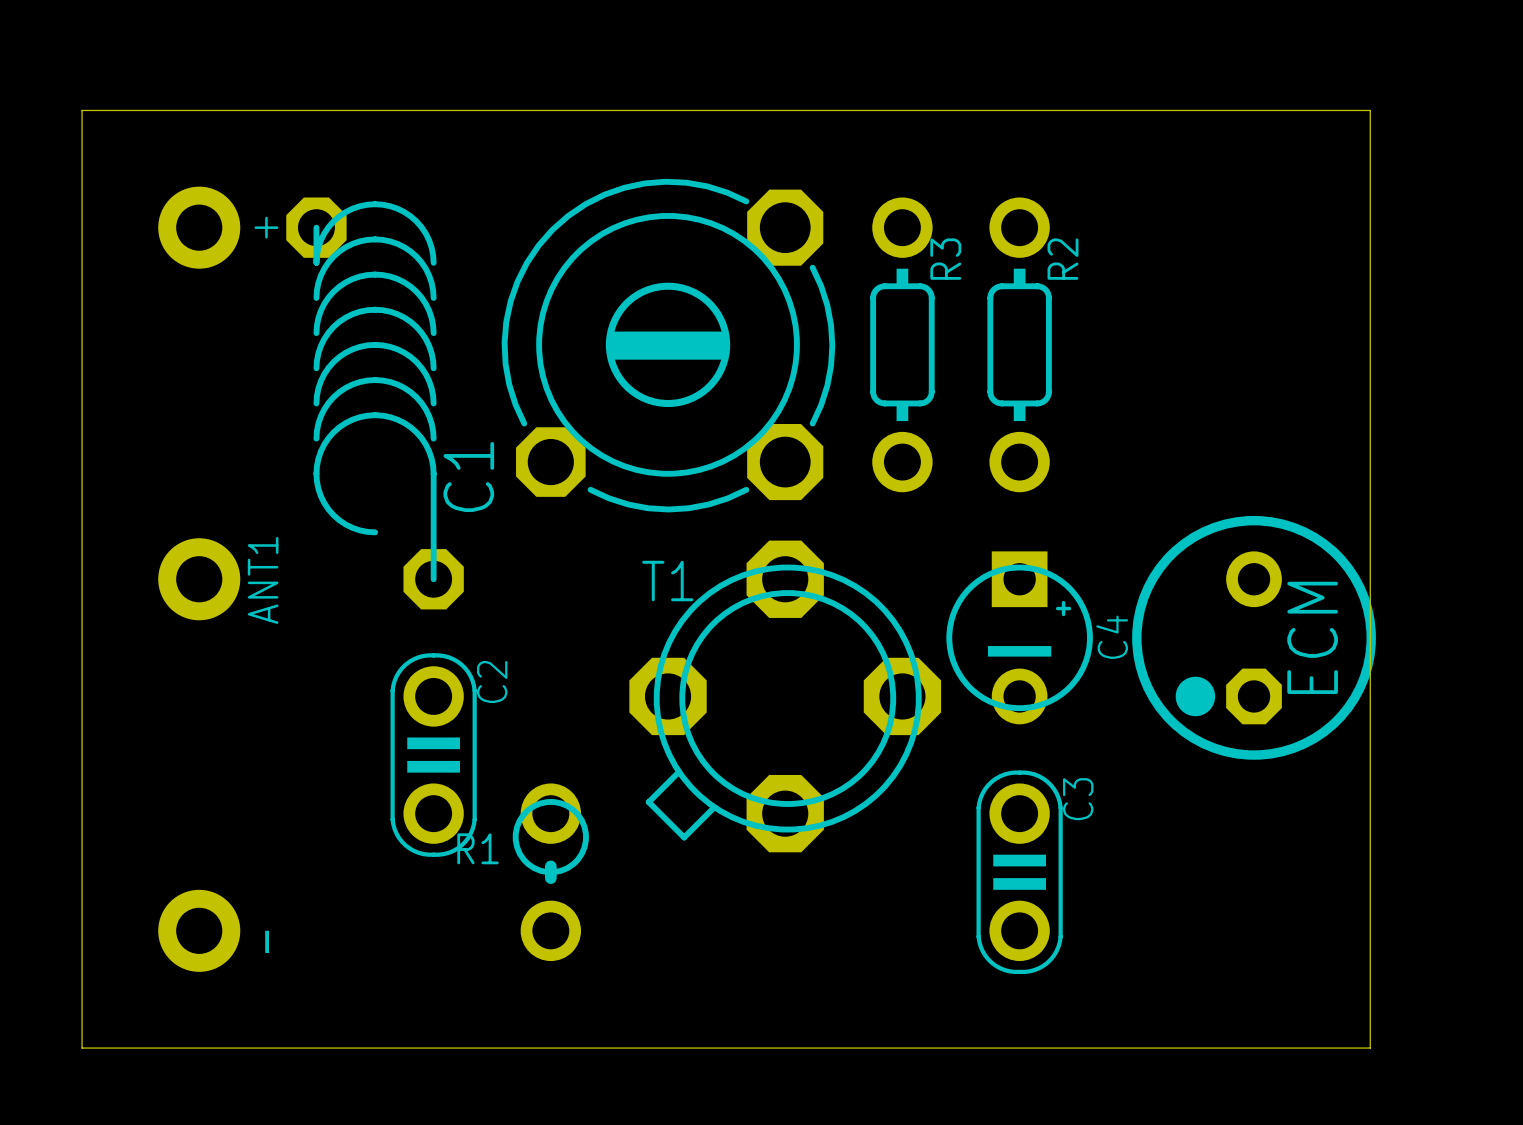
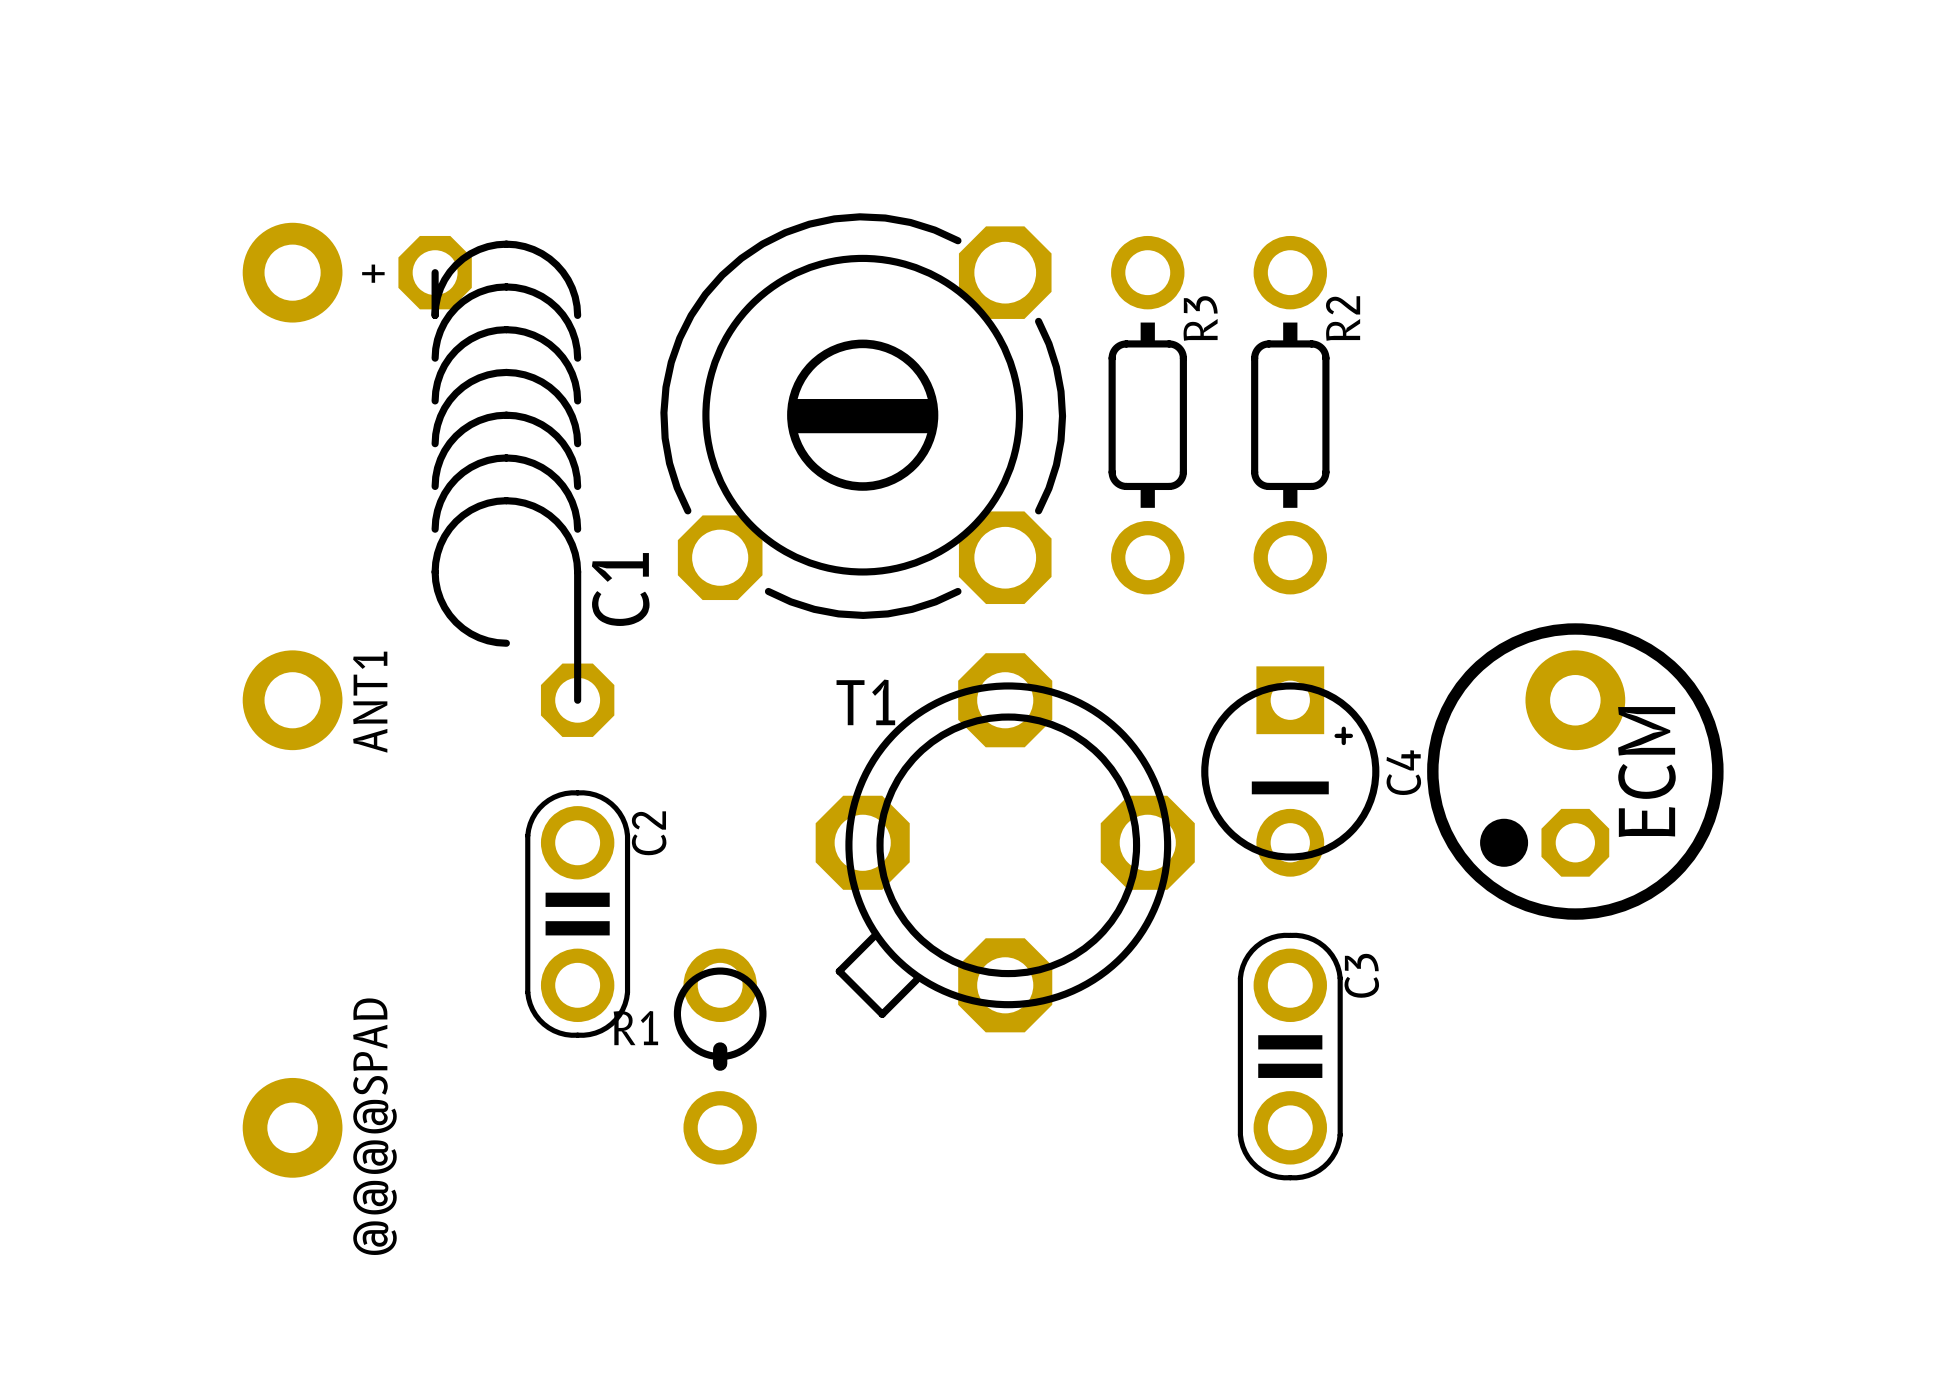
board edge: (82, 110) (1370, 110) (1370, 1048) (82, 1048) (82, 110) -> none
ECM footprint: [1132, 515, 1376, 760] -> [1427, 623, 1724, 920]
part: (199, 930) -> none
@@@@SPAD: none -> (292, 1127)

